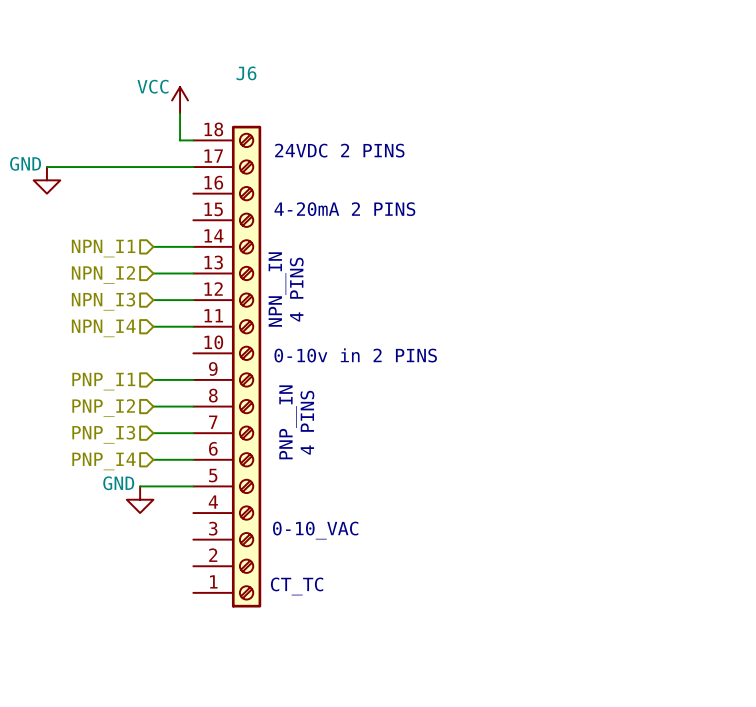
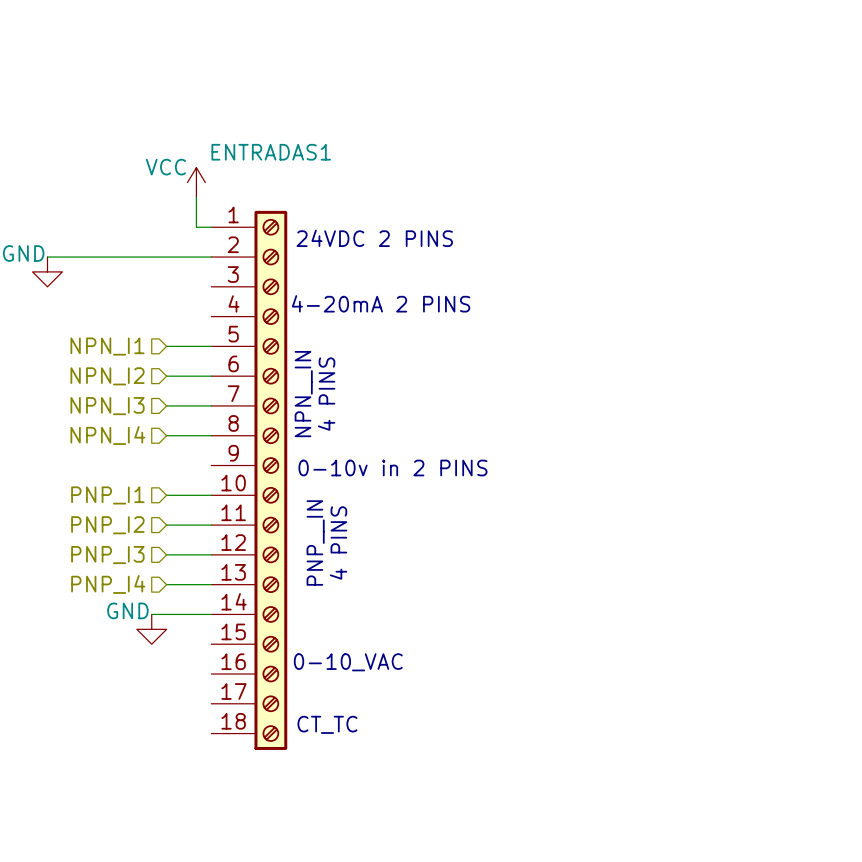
J6 name: J6 (246, 73) -> ENTRADAS1 (271, 152)
J6 symbol: [193, 125, 262, 608] -> [211, 210, 288, 750]

